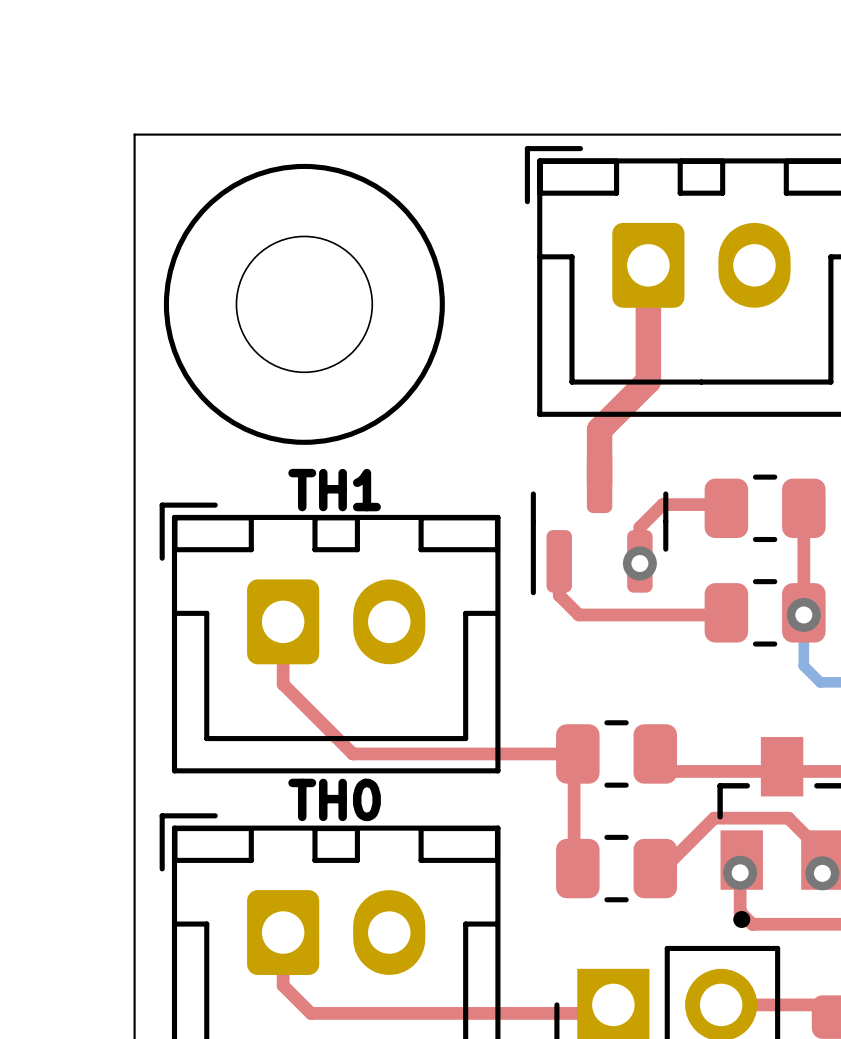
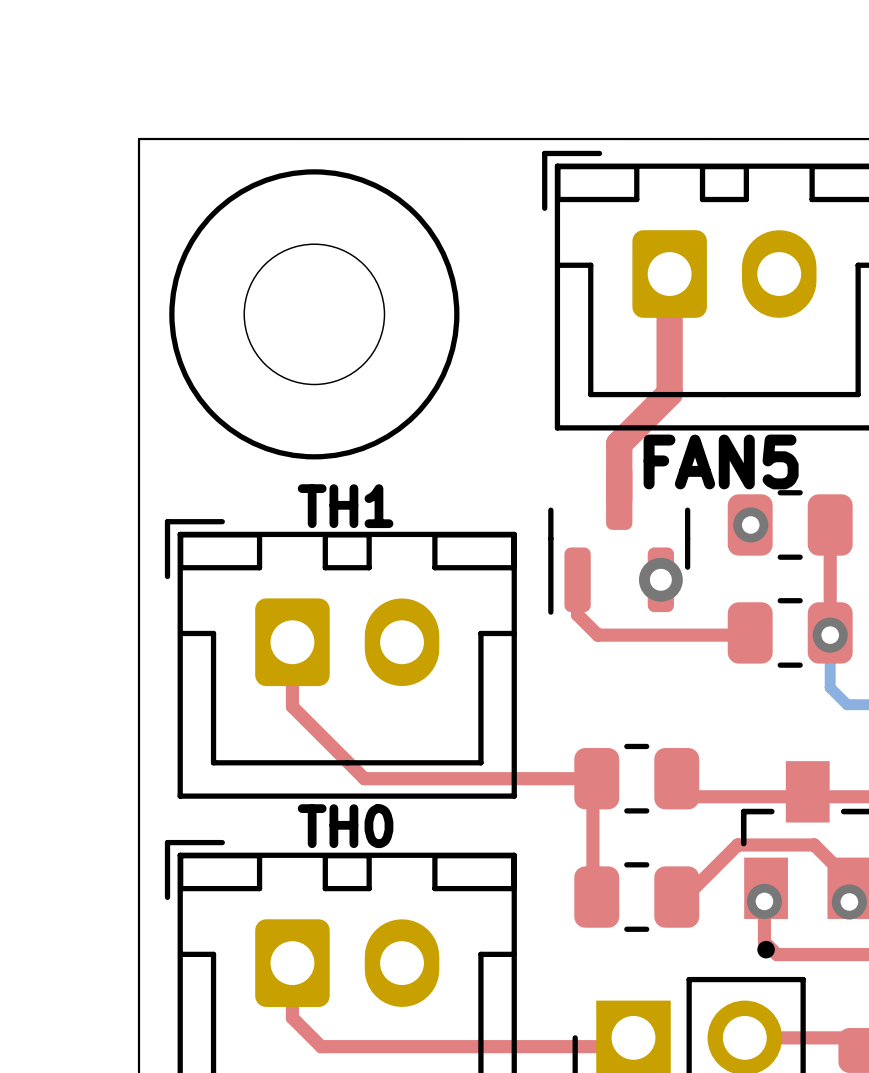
text: none -> FAN5 (721, 461)
top track: (726, 504) (662, 504) (639, 527) (639, 563) -> none
via: none -> (660, 579)
via position: (639, 563) -> (750, 524)

